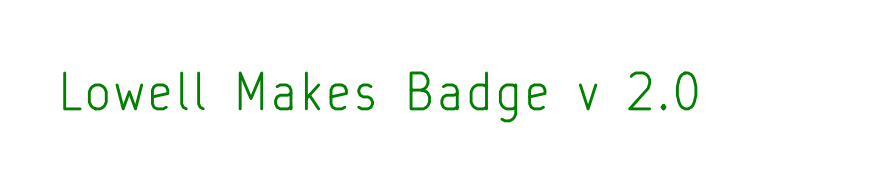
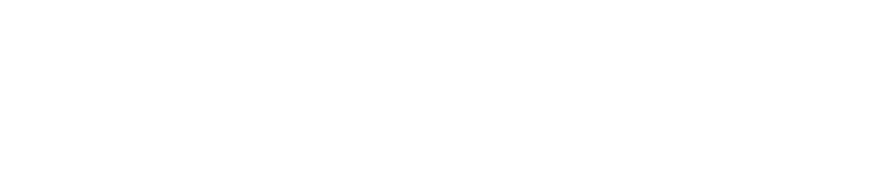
text: Lowell Makes Badge v 2.0 (380, 96) -> none

